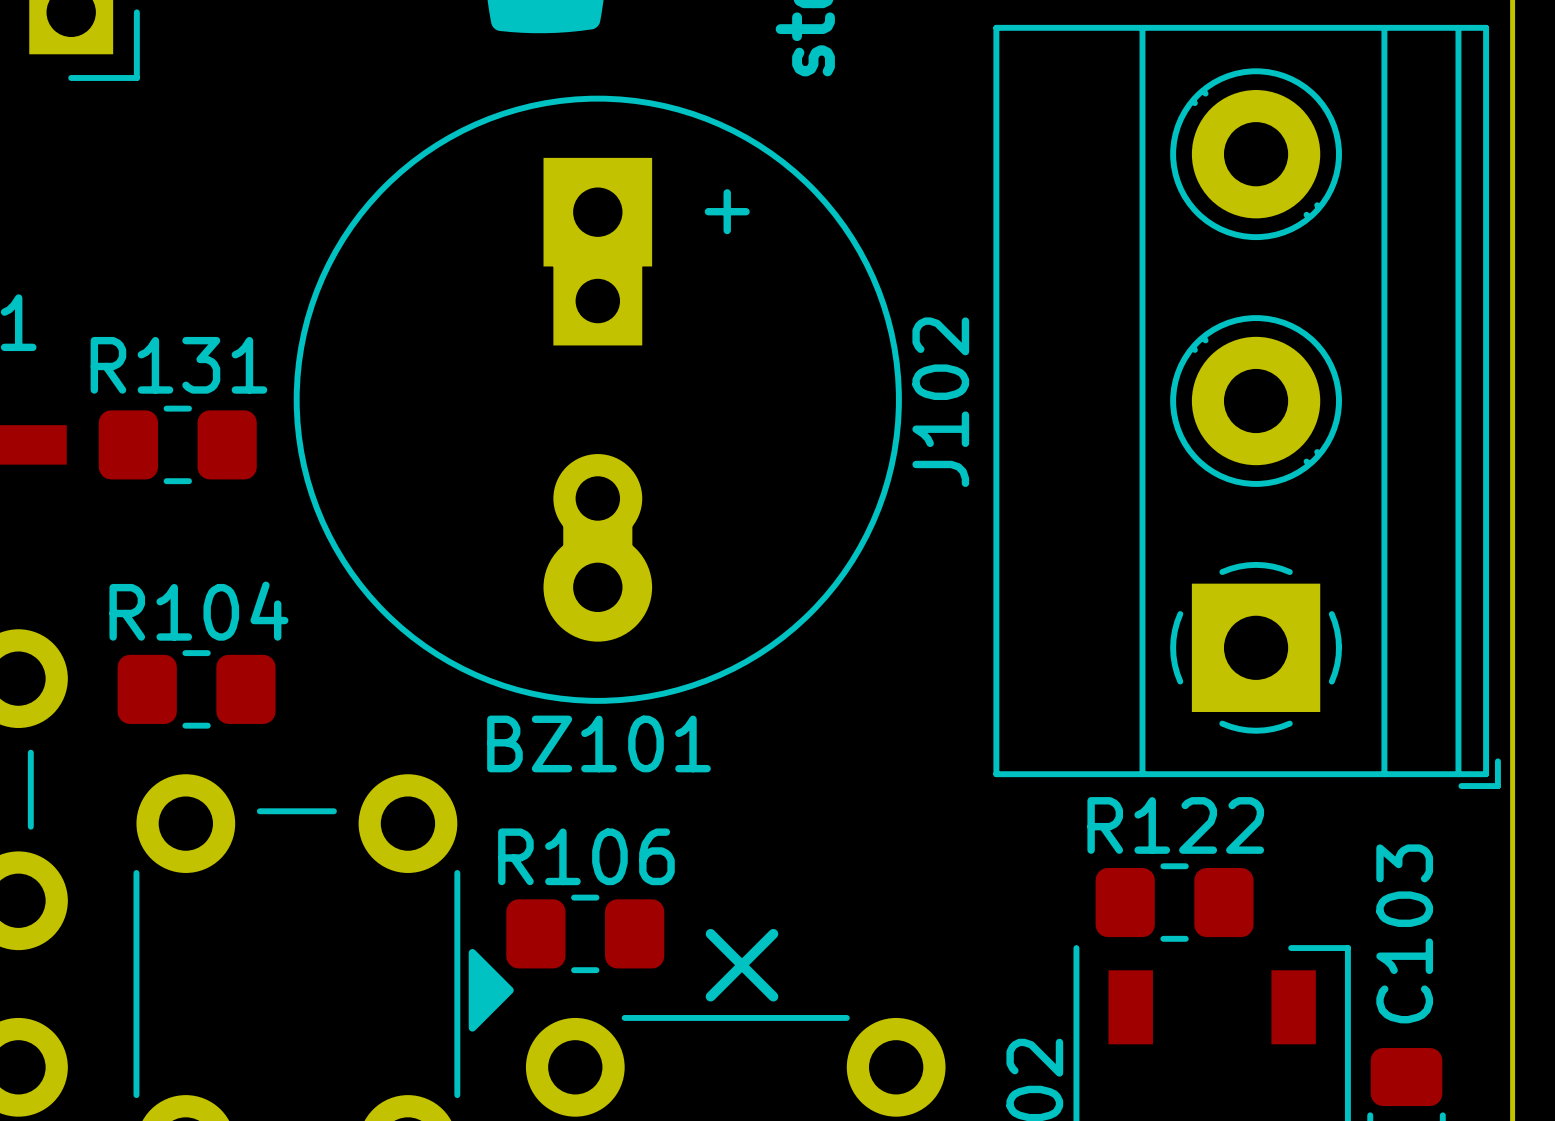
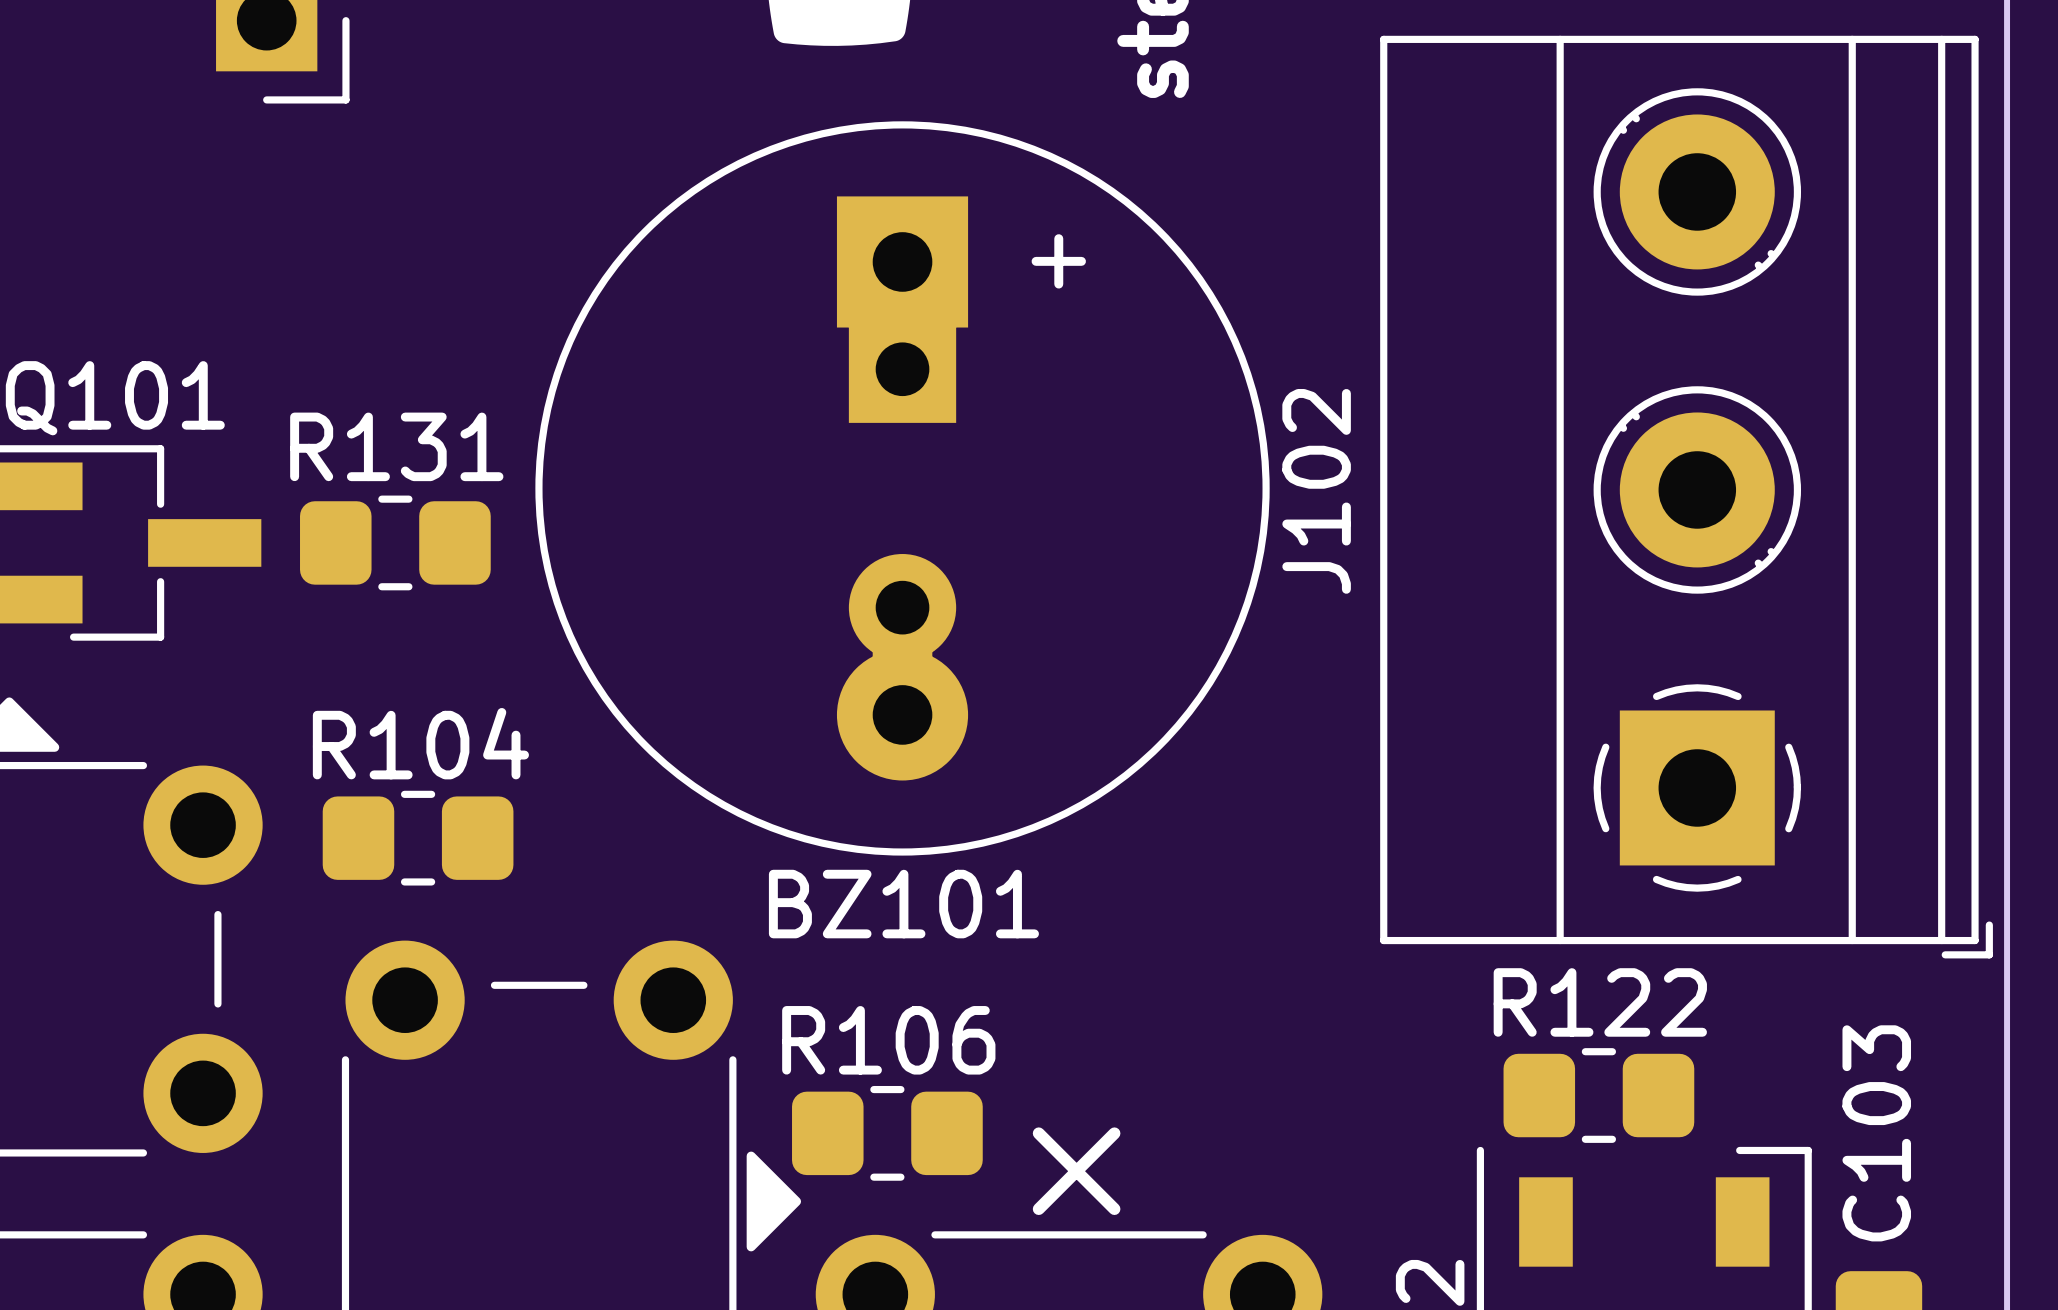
BZ101 footprint: [293, 95, 902, 704] -> [535, 121, 1270, 856]

